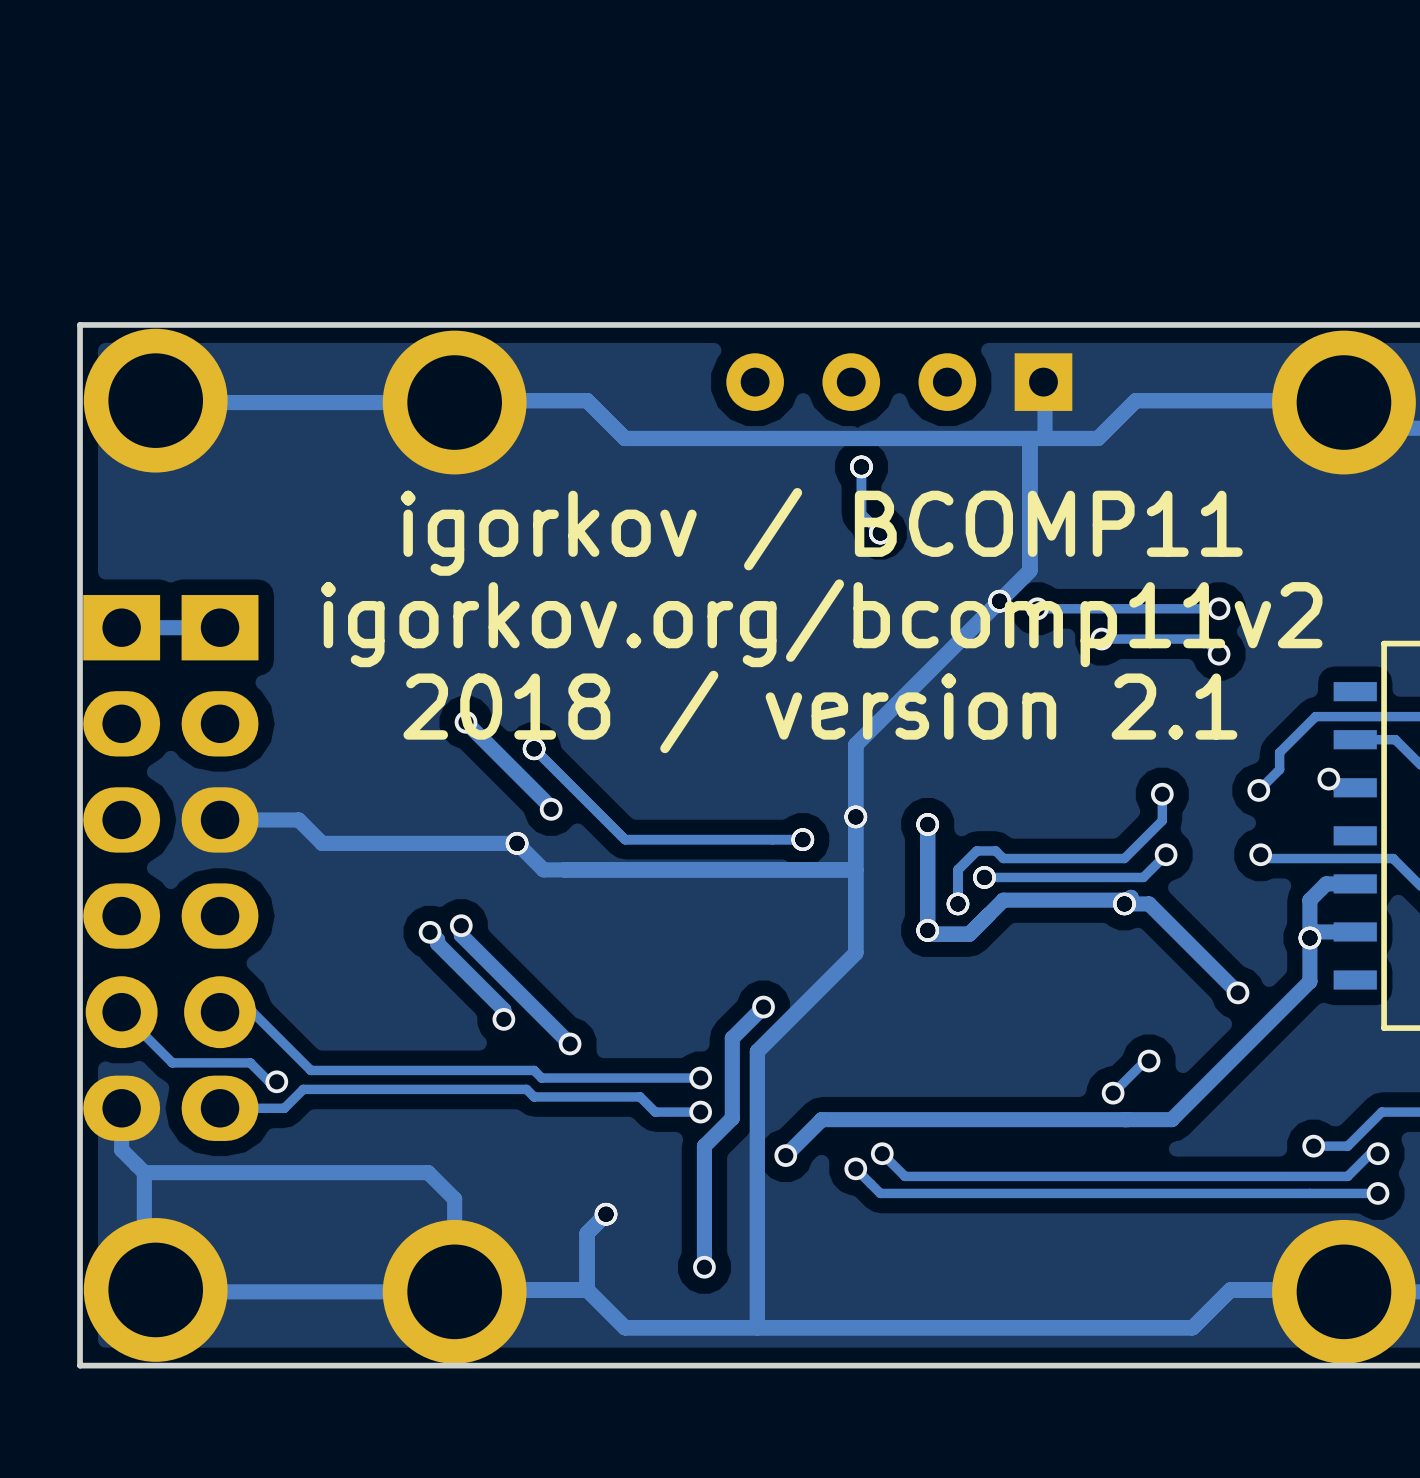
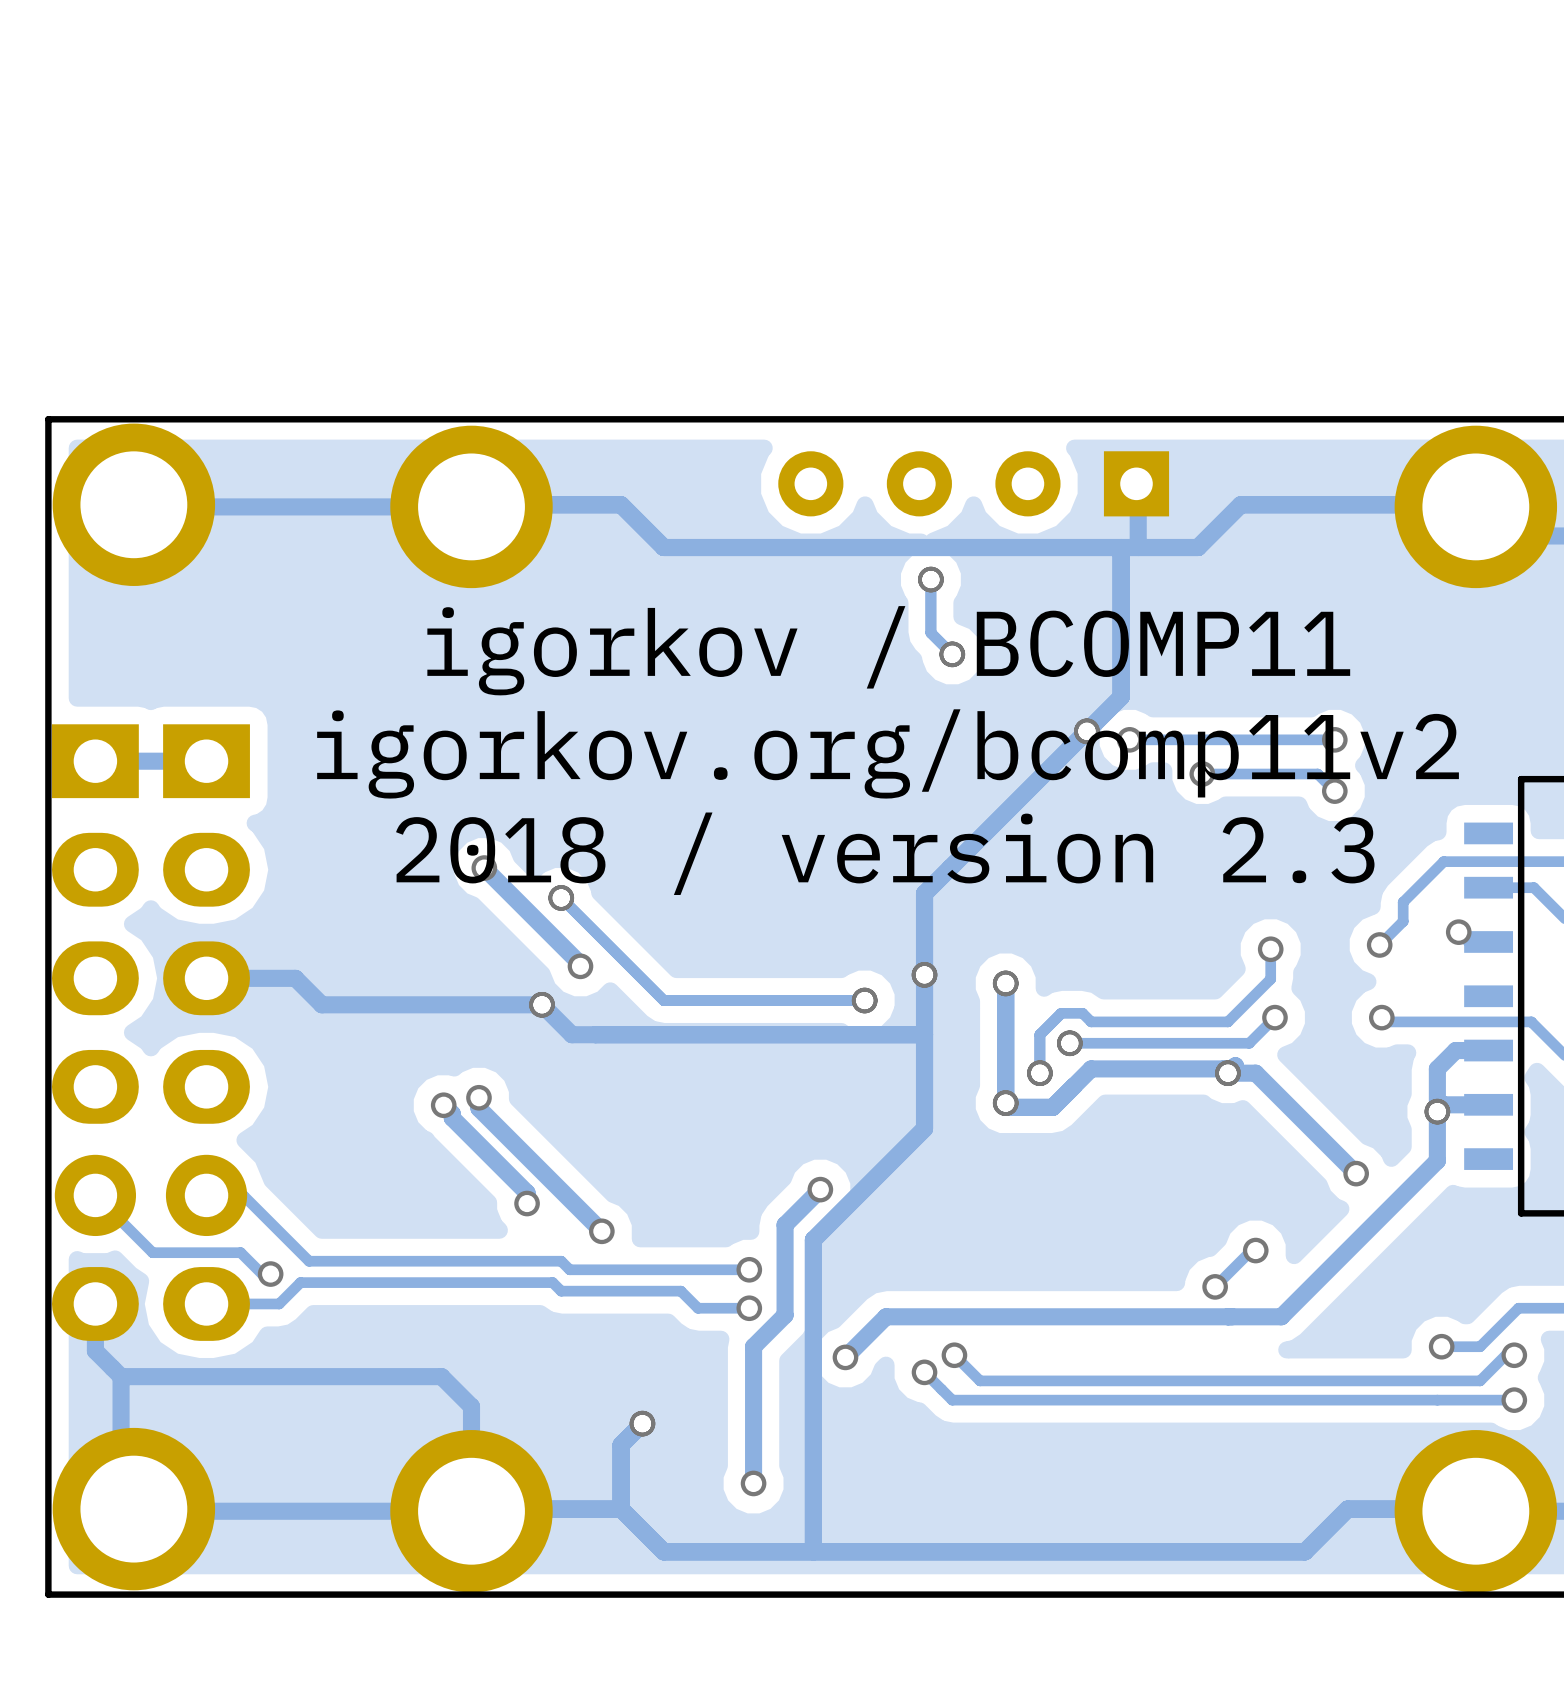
text: 2018 / version 2.1 (820, 711) -> 2018 / version 2.3 (885, 853)

